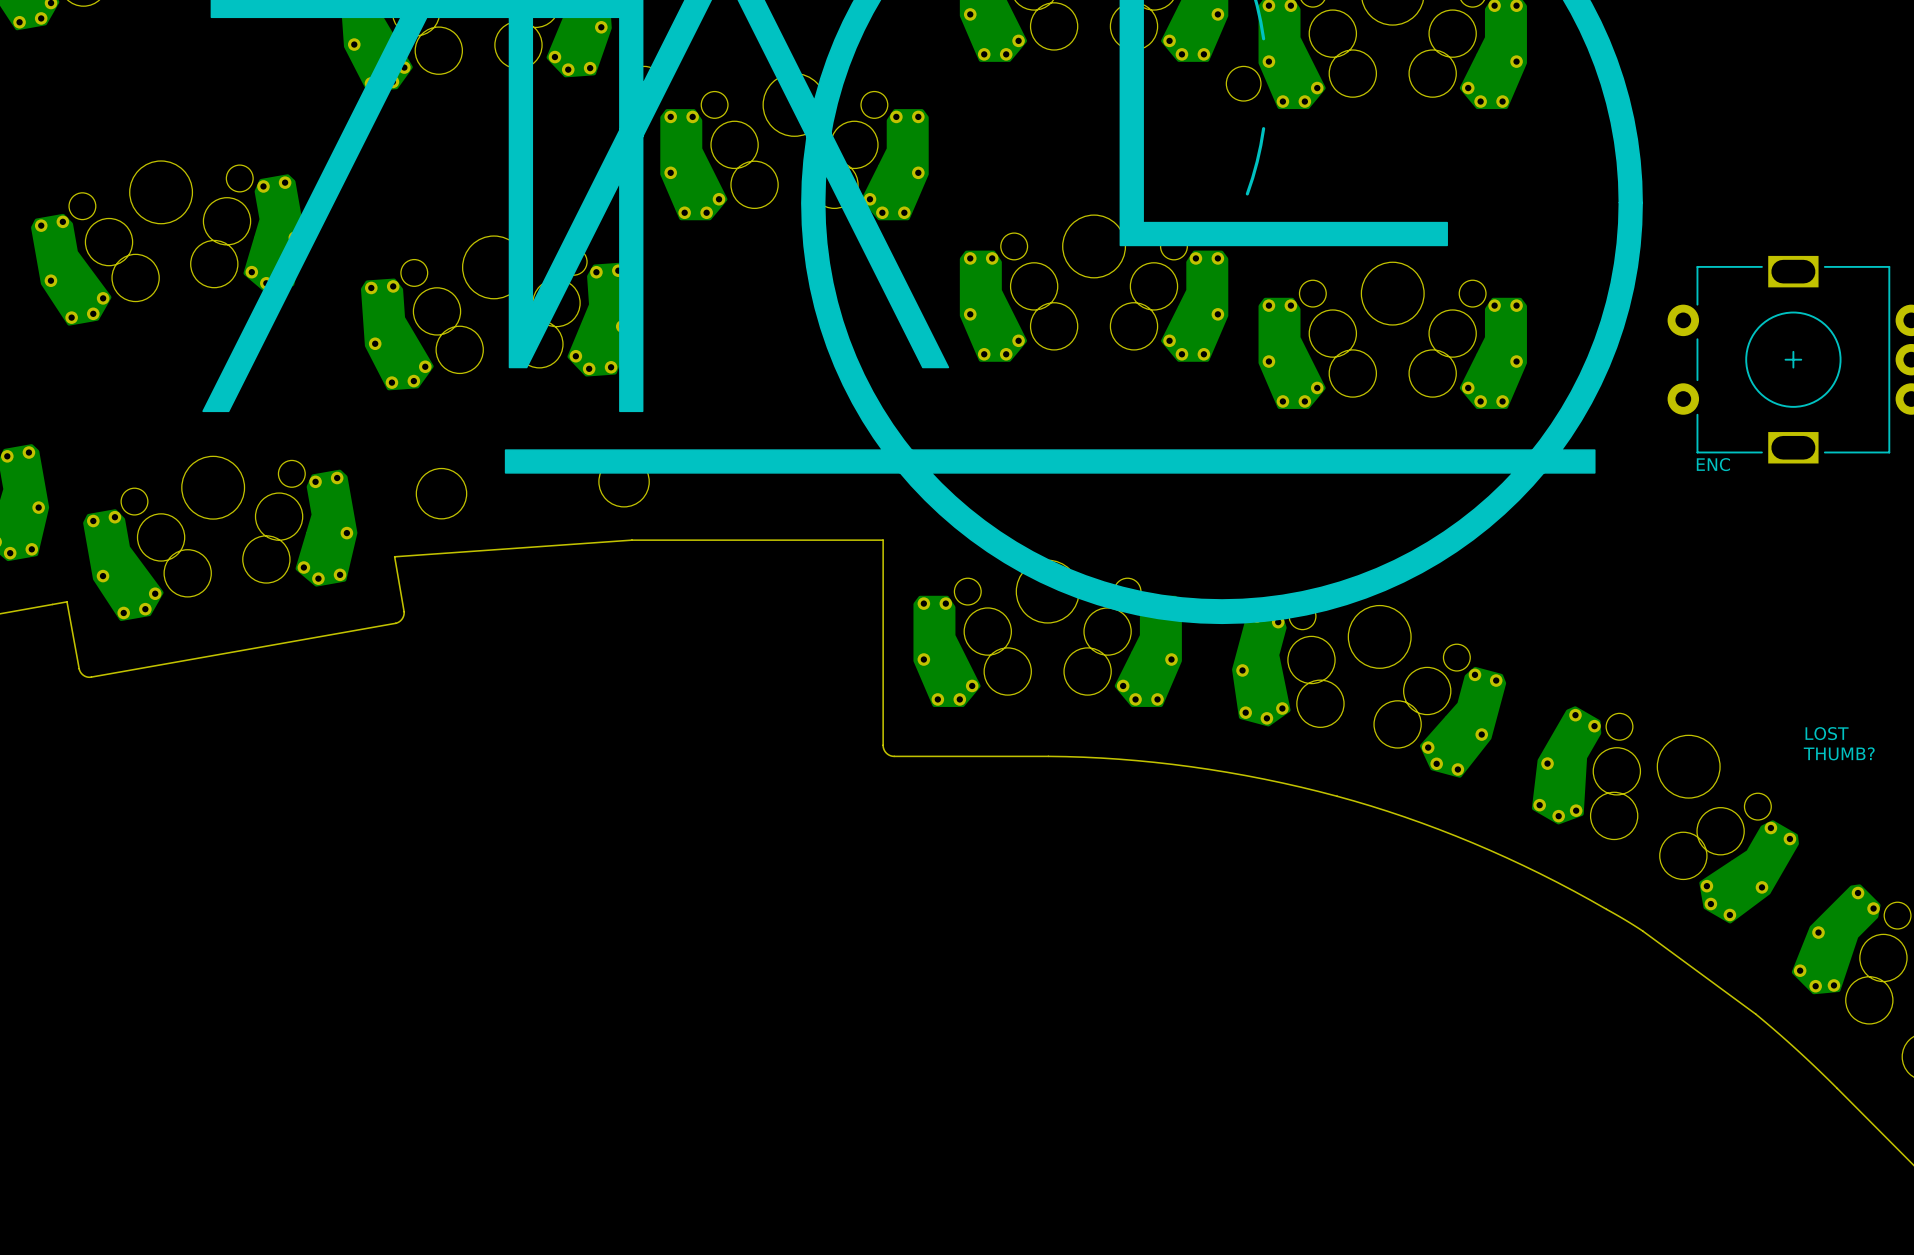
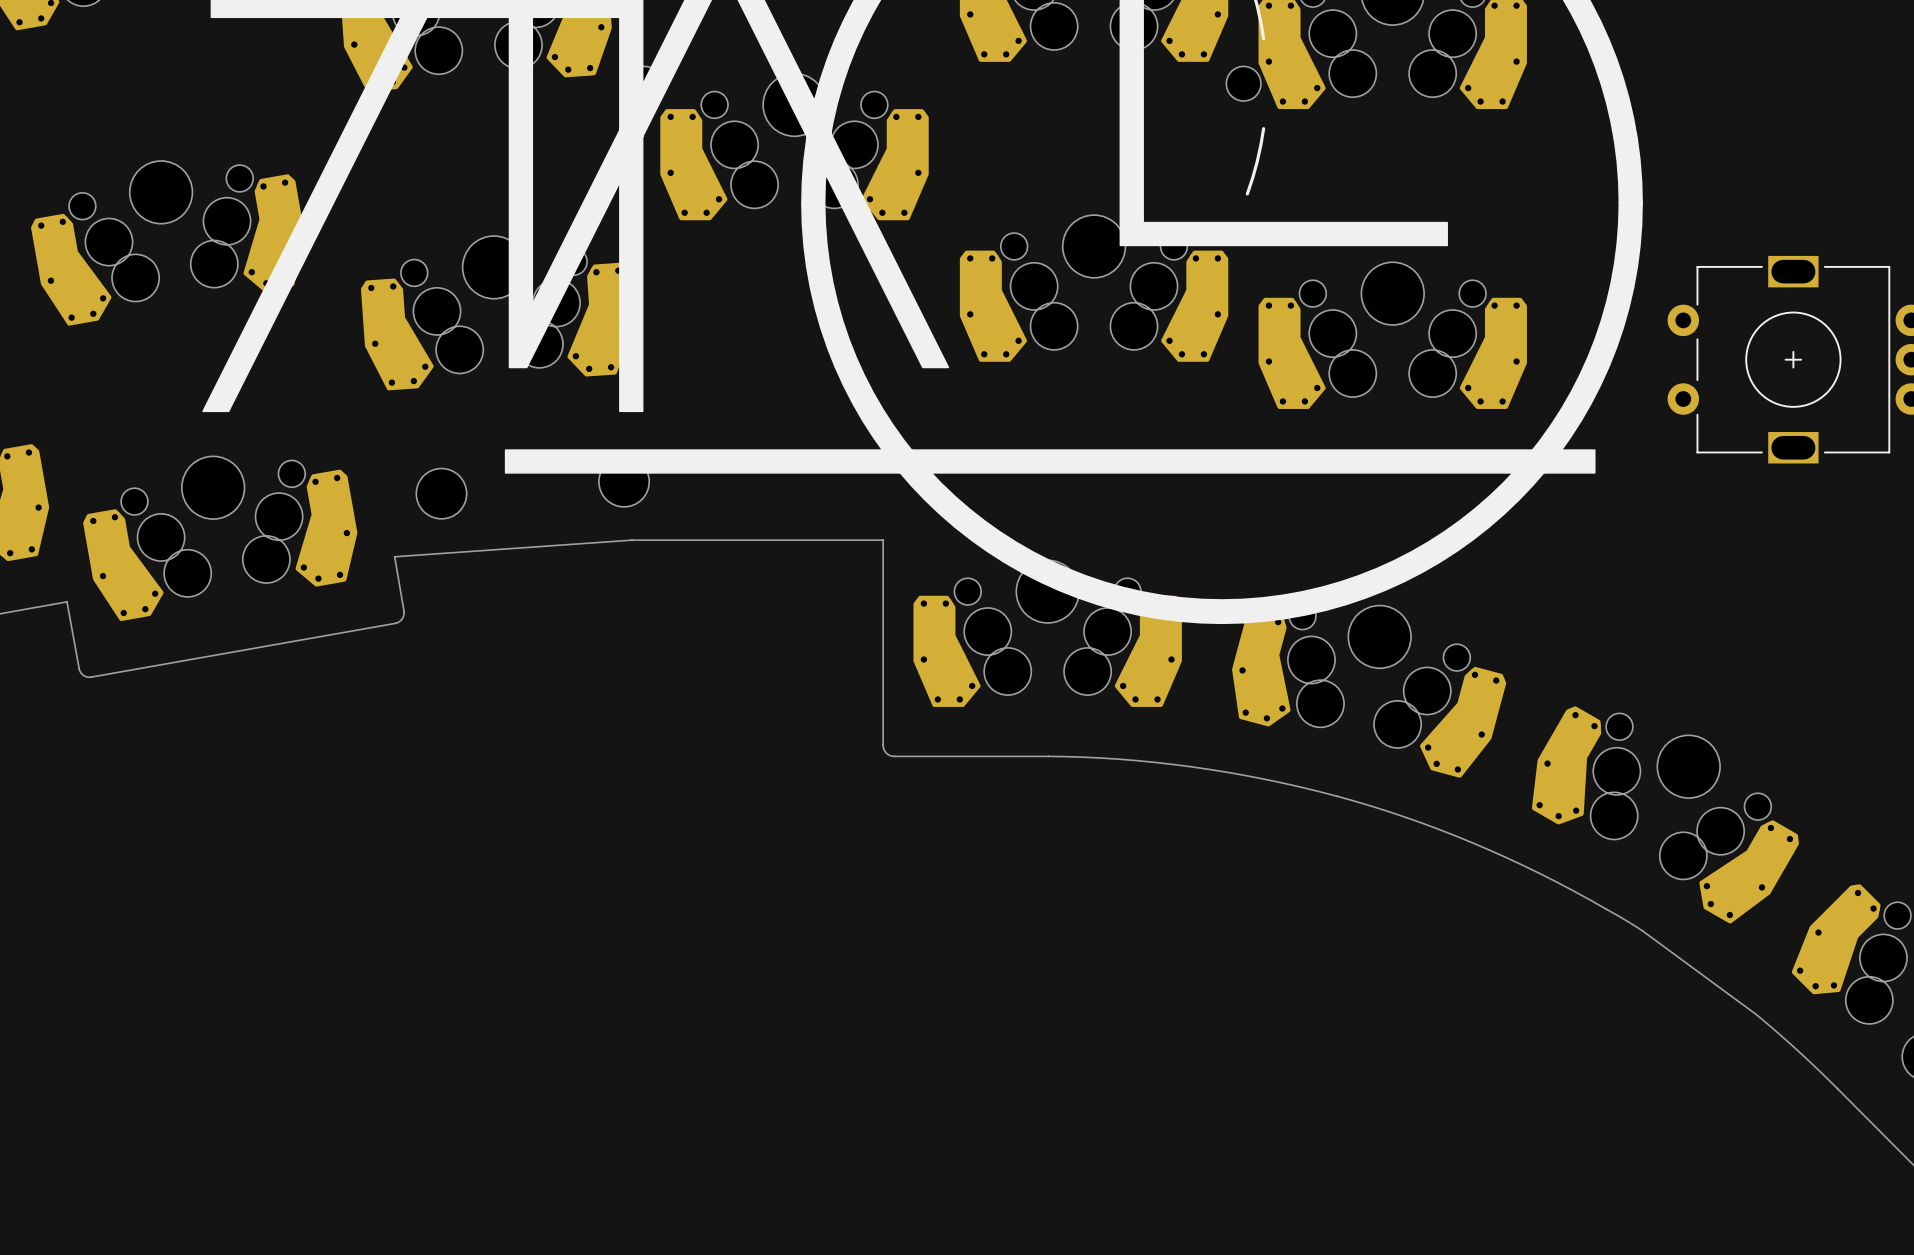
text: ENC (1713, 464) -> none
text: LOST (1827, 733) -> none
text: THUMB? (1839, 753) -> none

